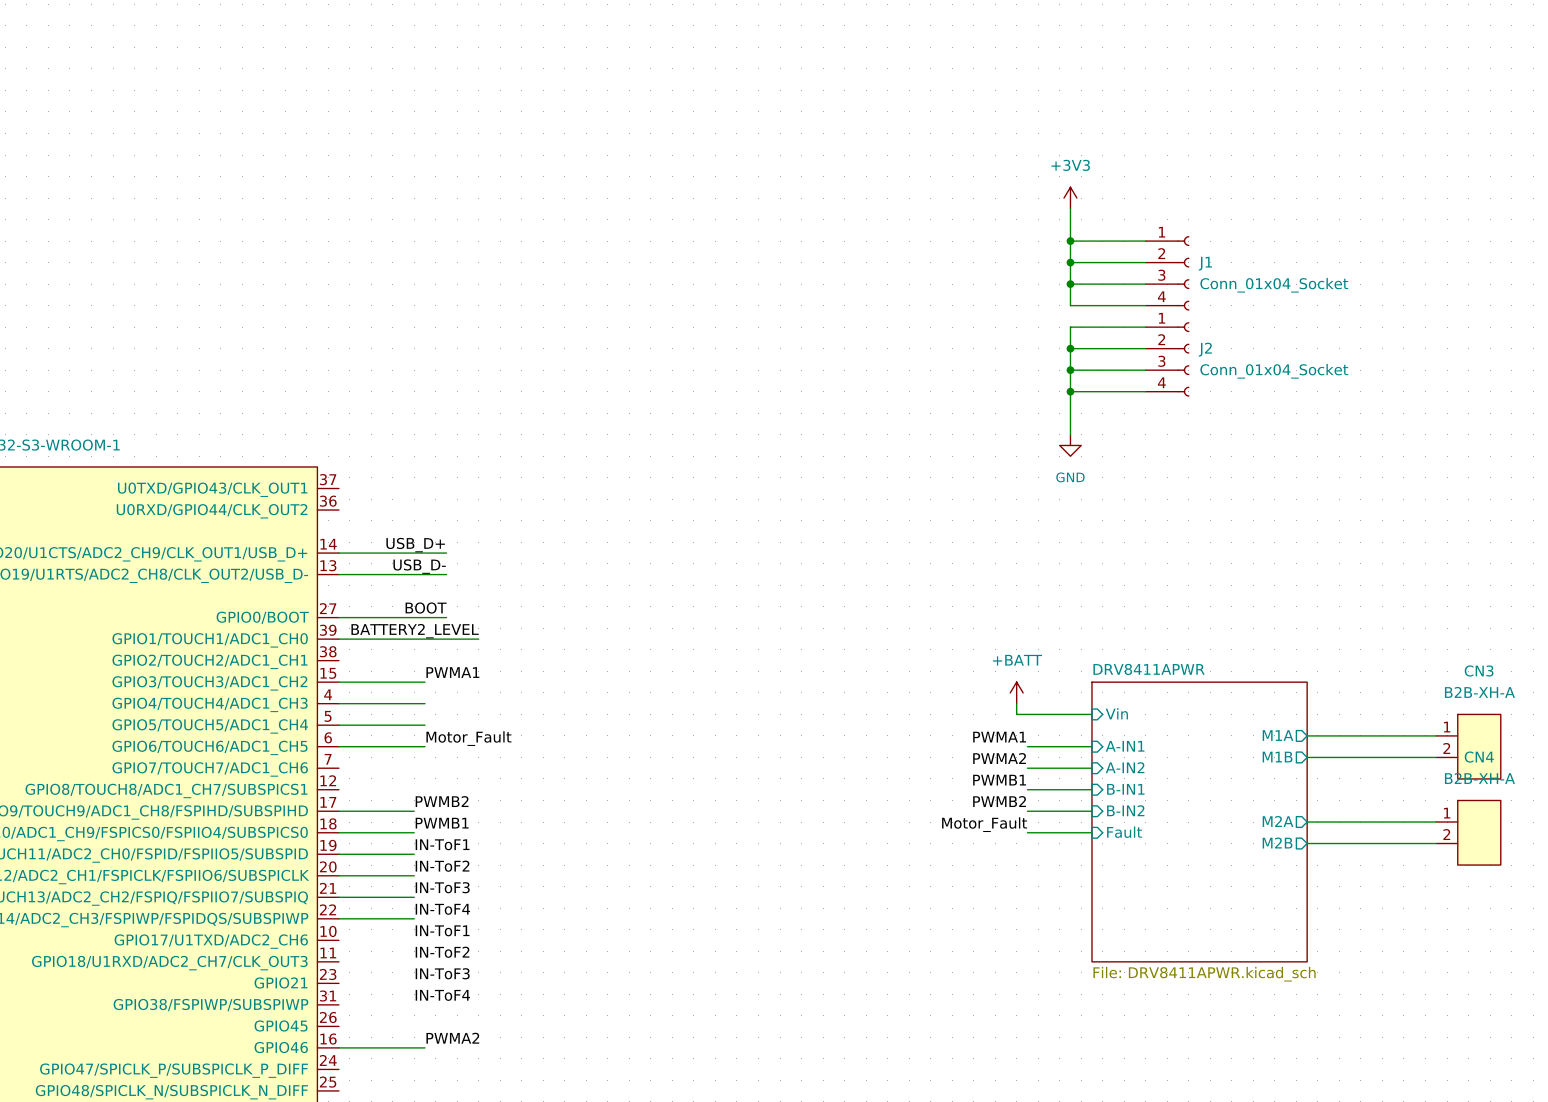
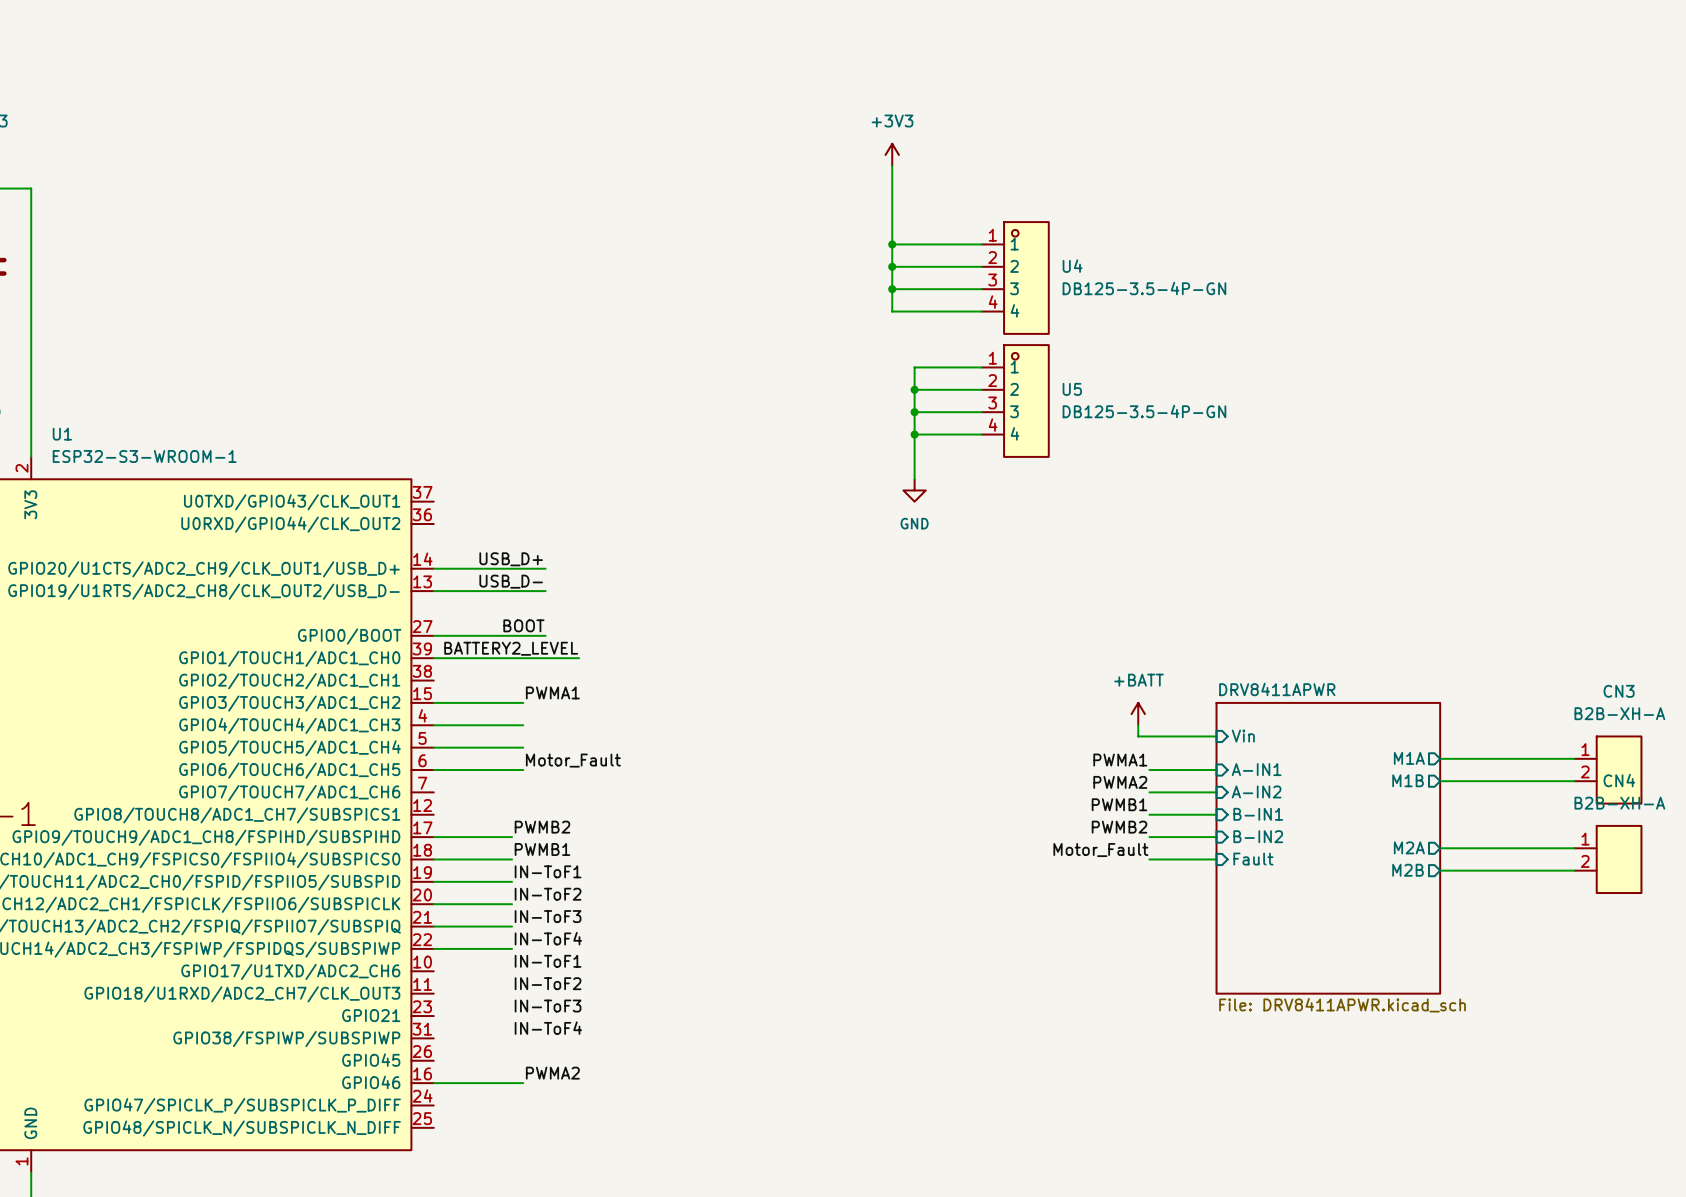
power symbol: none -> +3V3 (892, 154)
wire: none -> (892, 166) (892, 311) (981, 311)
power symbol: +3V3 (1070, 198) -> none
wire: (1070, 208) (1070, 305) (1145, 305) -> none
wire: none -> (892, 244) (981, 244)
junction: none -> (892, 244)
wire: (1070, 241) (1145, 241) -> none
junction: (1070, 241) -> none
wire: none -> (892, 266) (981, 266)
junction: none -> (892, 266)
wire: (1070, 262) (1145, 262) -> none
junction: (1070, 262) -> none
U4: none -> DB125-3.5-4P-GN (1015, 277)
J1: Conn_01x04_Socket (1167, 273) -> none
wire: none -> (892, 289) (981, 289)
junction: none -> (892, 289)
wire: (1070, 284) (1145, 284) -> none
junction: (1070, 284) -> none
wire: (1145, 327) (1070, 327) (1070, 434) -> none
wire: (1070, 348) (1145, 348) -> none
junction: (1070, 348) -> none
wire: none -> (981, 367) (914, 367) (914, 479)
J2: Conn_01x04_Socket (1167, 359) -> none
wire: (1070, 370) (1145, 370) -> none
junction: (1070, 370) -> none
wire: none -> (914, 389) (981, 389)
junction: none -> (914, 389)
U5: none -> DB125-3.5-4P-GN (1015, 401)
wire: (1070, 391) (1145, 391) -> none
junction: (1070, 391) -> none
wire: none -> (914, 412) (981, 412)
junction: none -> (914, 412)
wire: none -> (914, 434) (981, 434)
junction: none -> (914, 434)
power symbol: GND (1070, 445) -> none
power symbol: none -> GND (914, 490)

